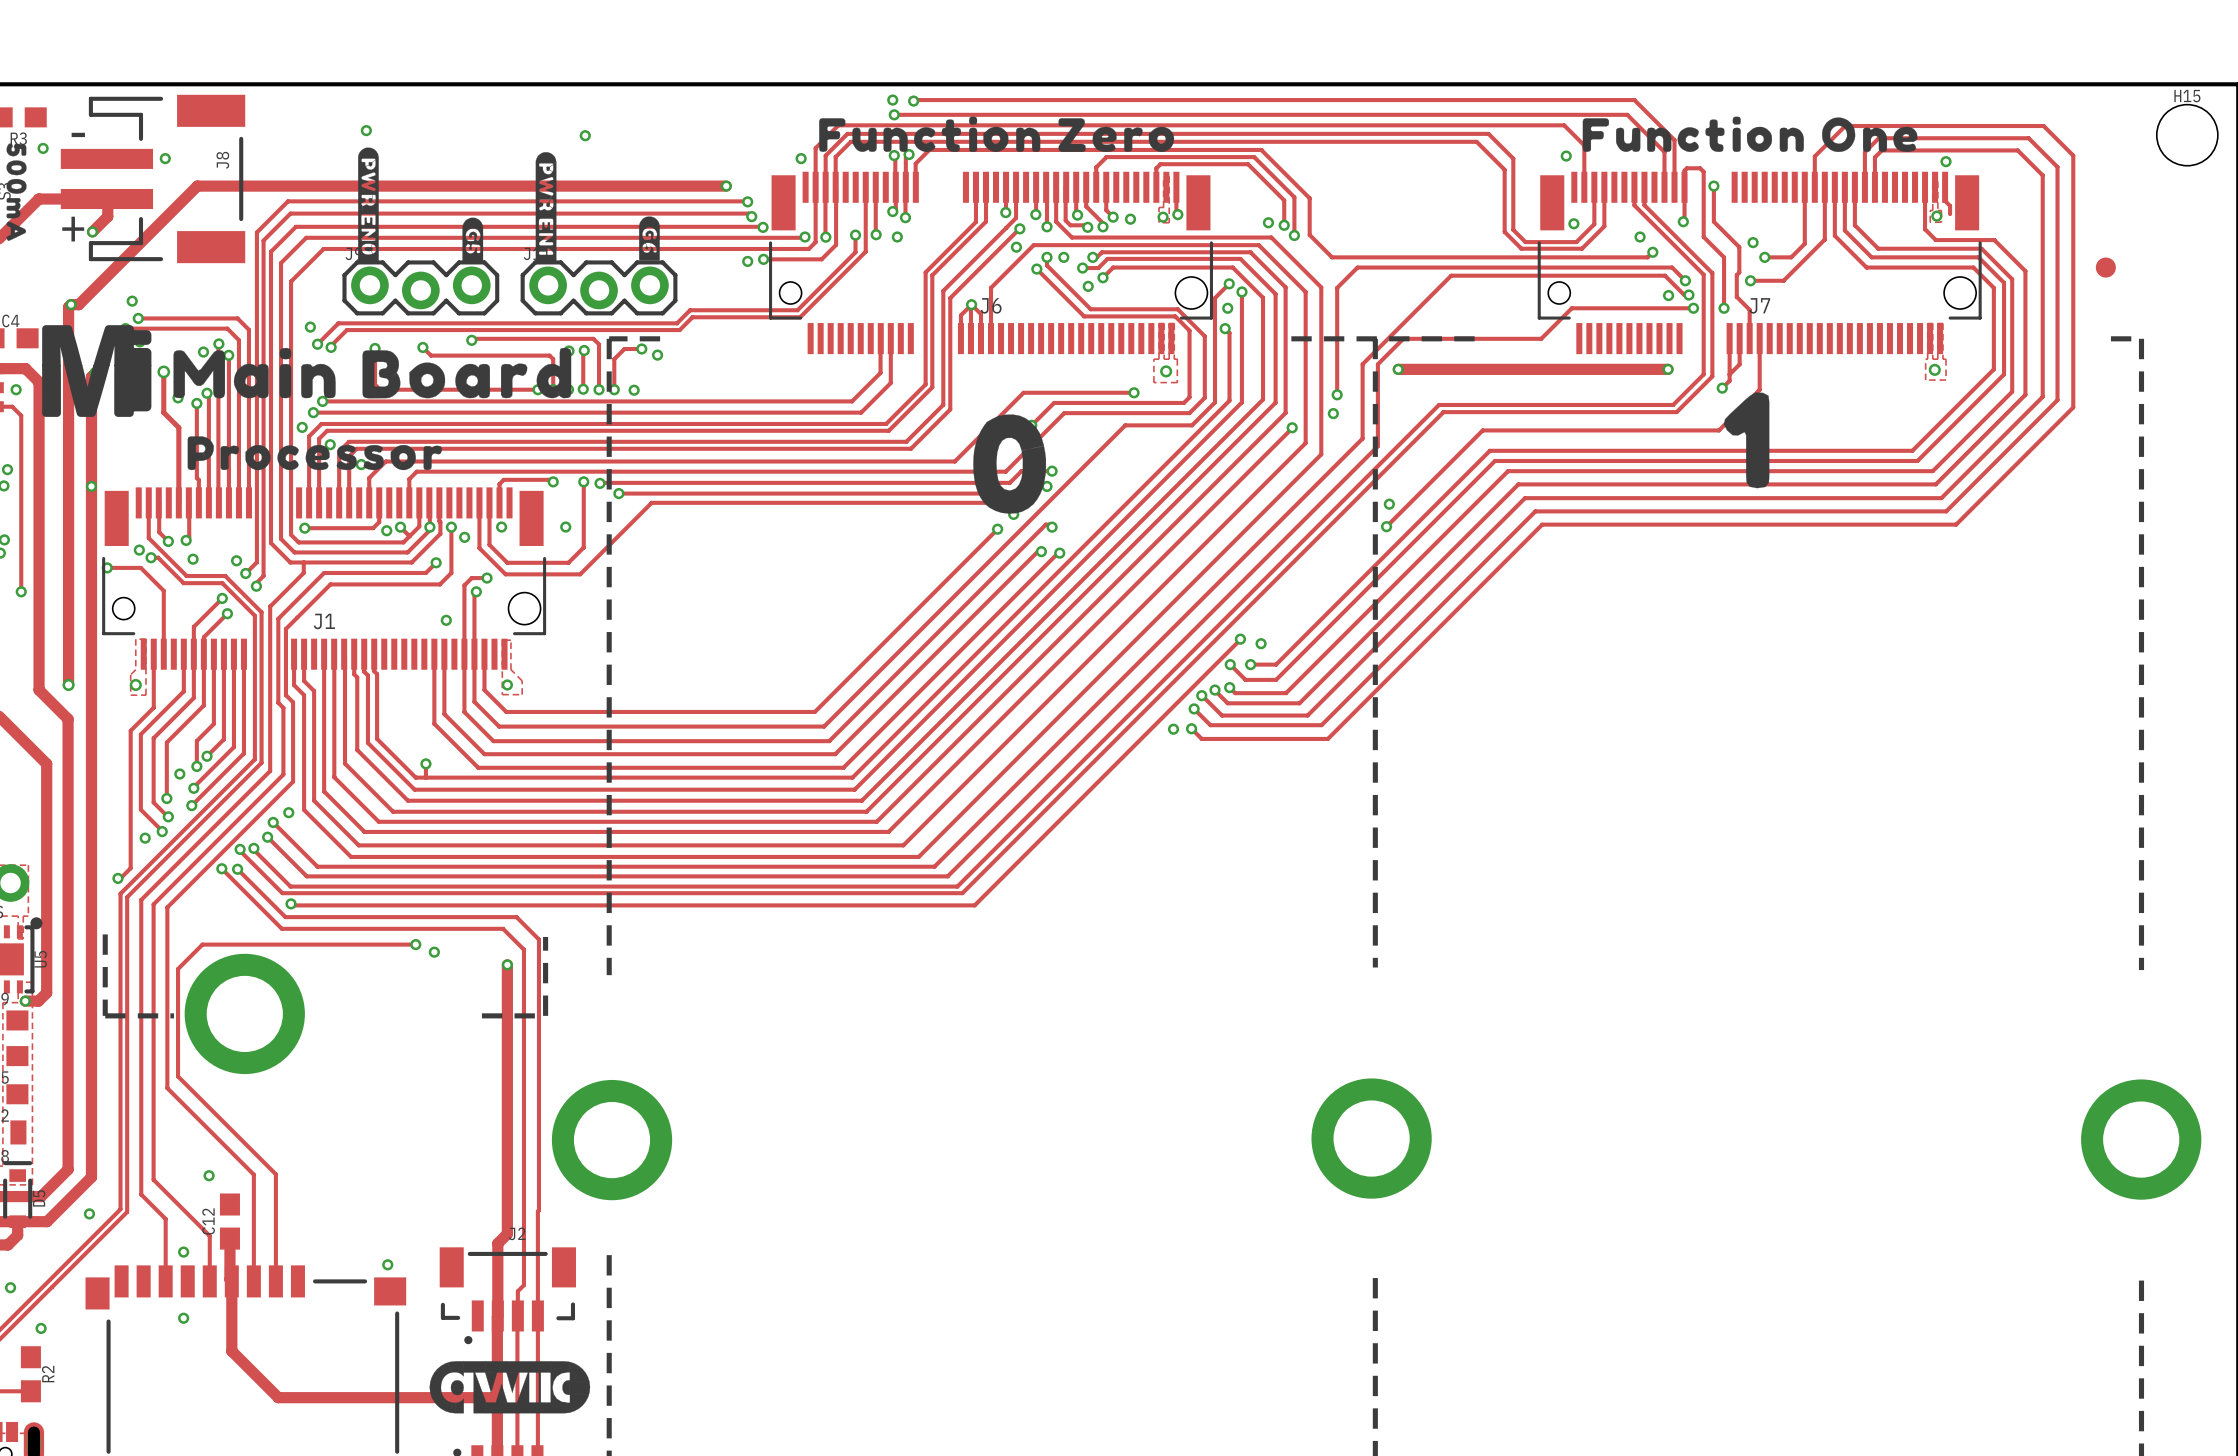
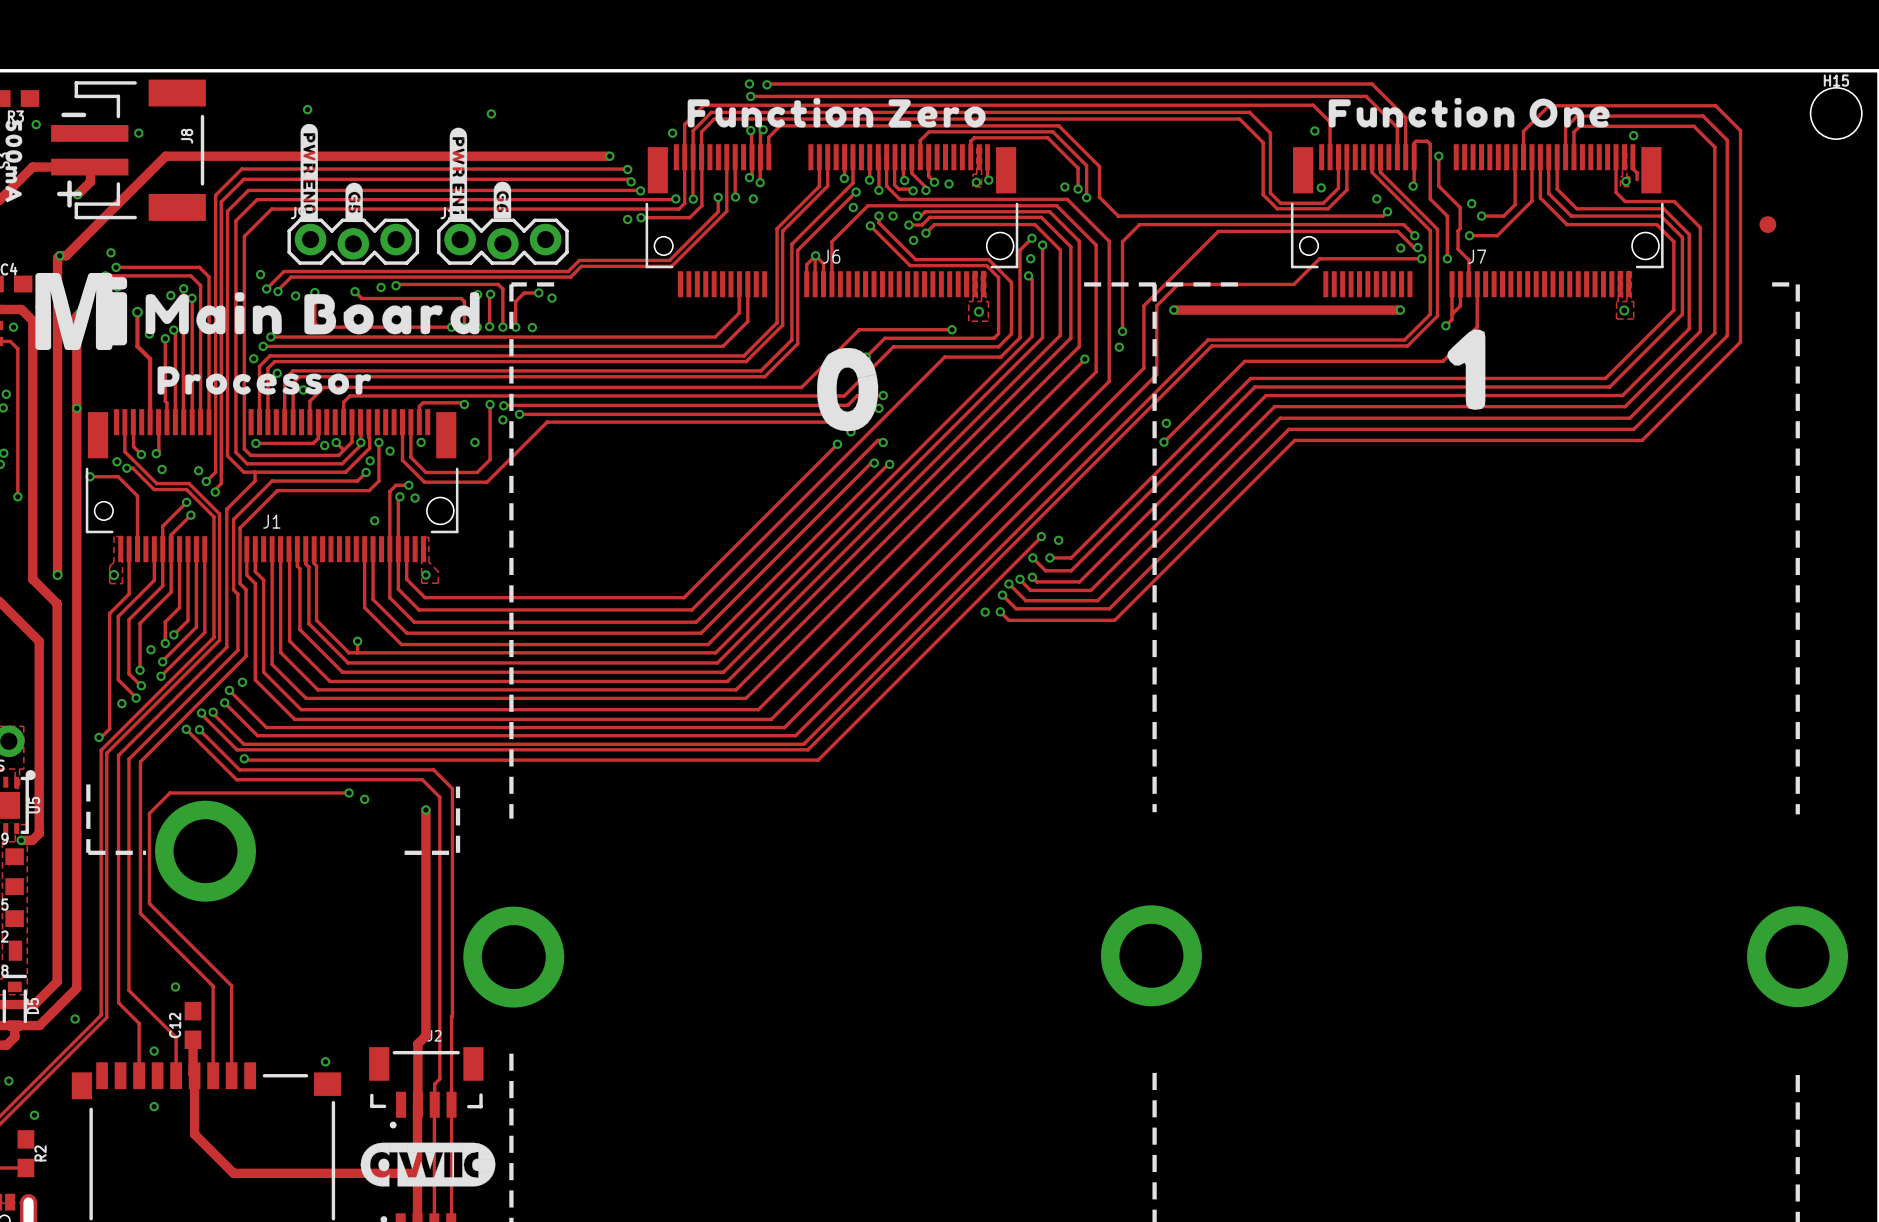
drawing position: (649, 238) -> (502, 200)
drawing position: (472, 239) -> (354, 201)
via: none -> (381, 287)
via: none -> (295, 295)
via: none -> (502, 419)
via: none -> (370, 460)
via: none -> (415, 498)

